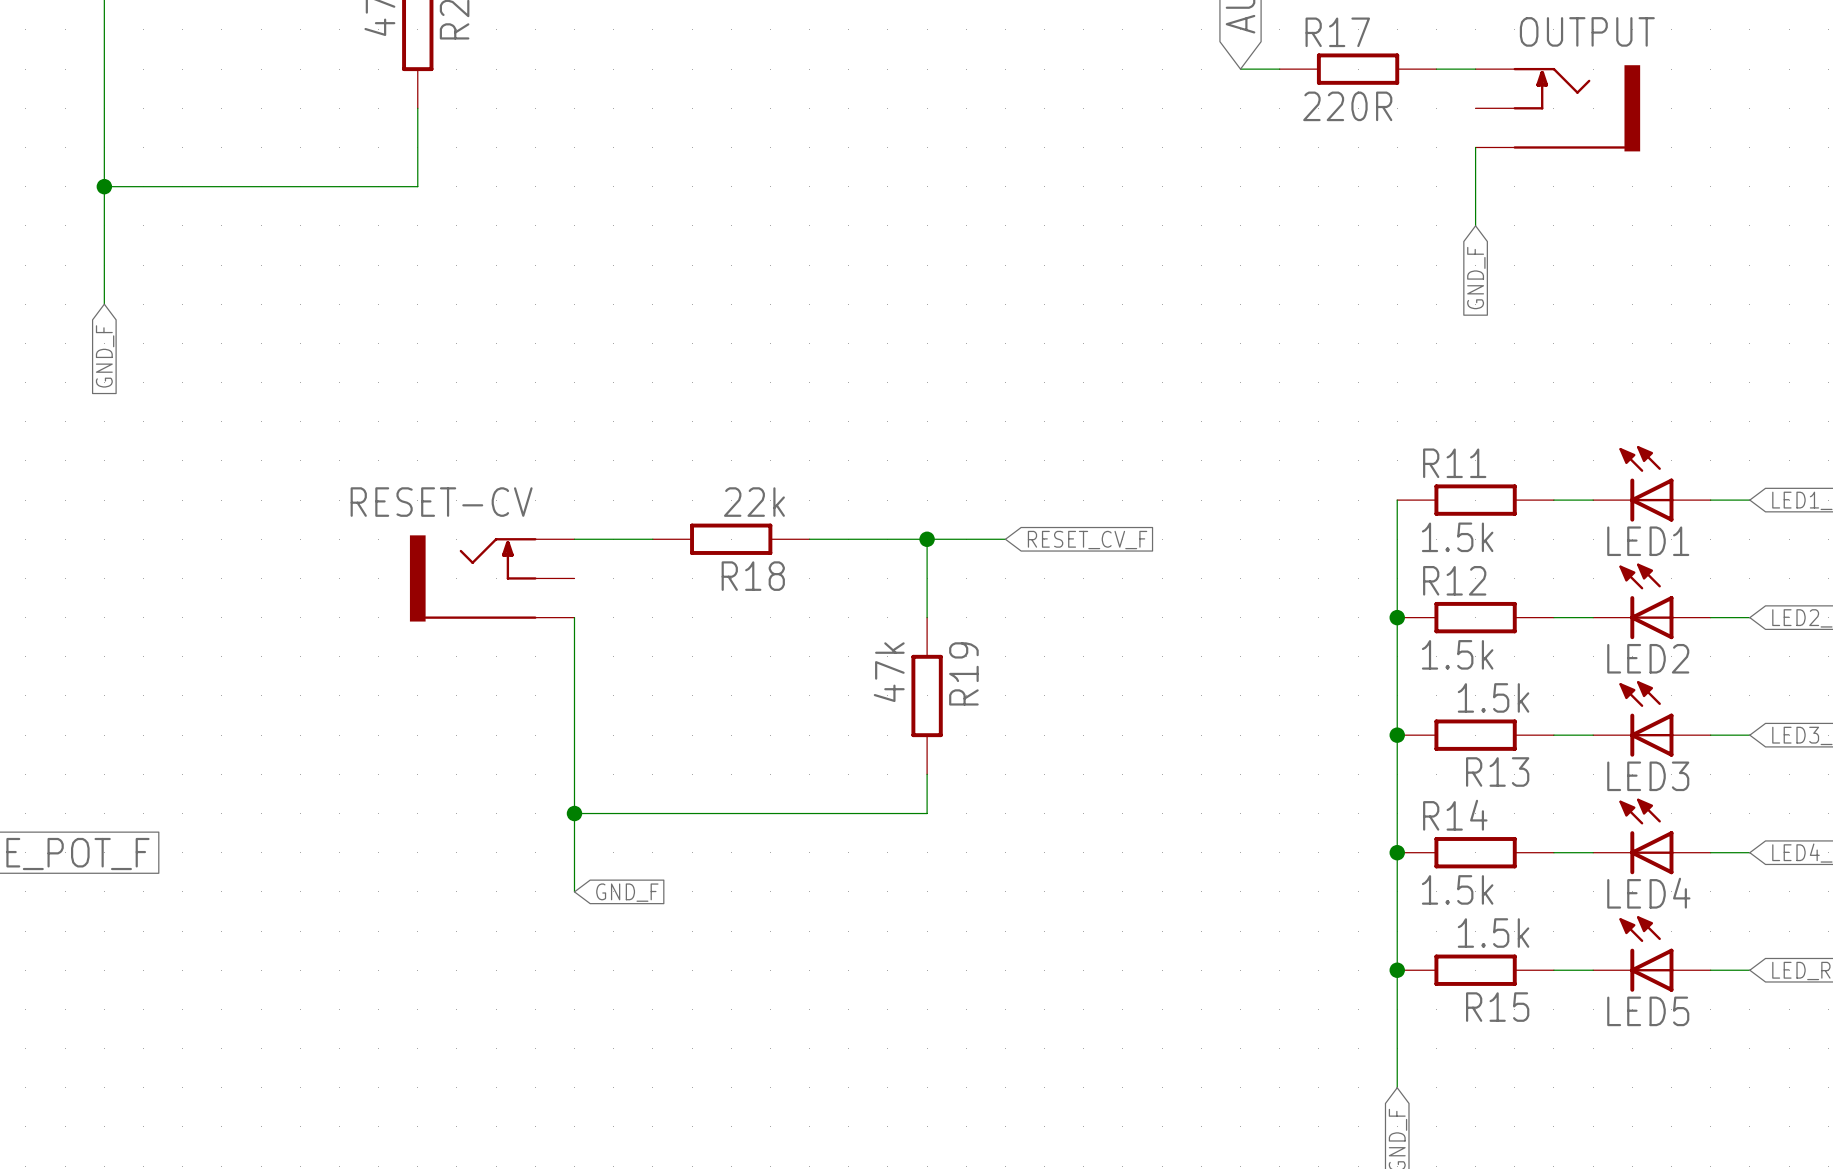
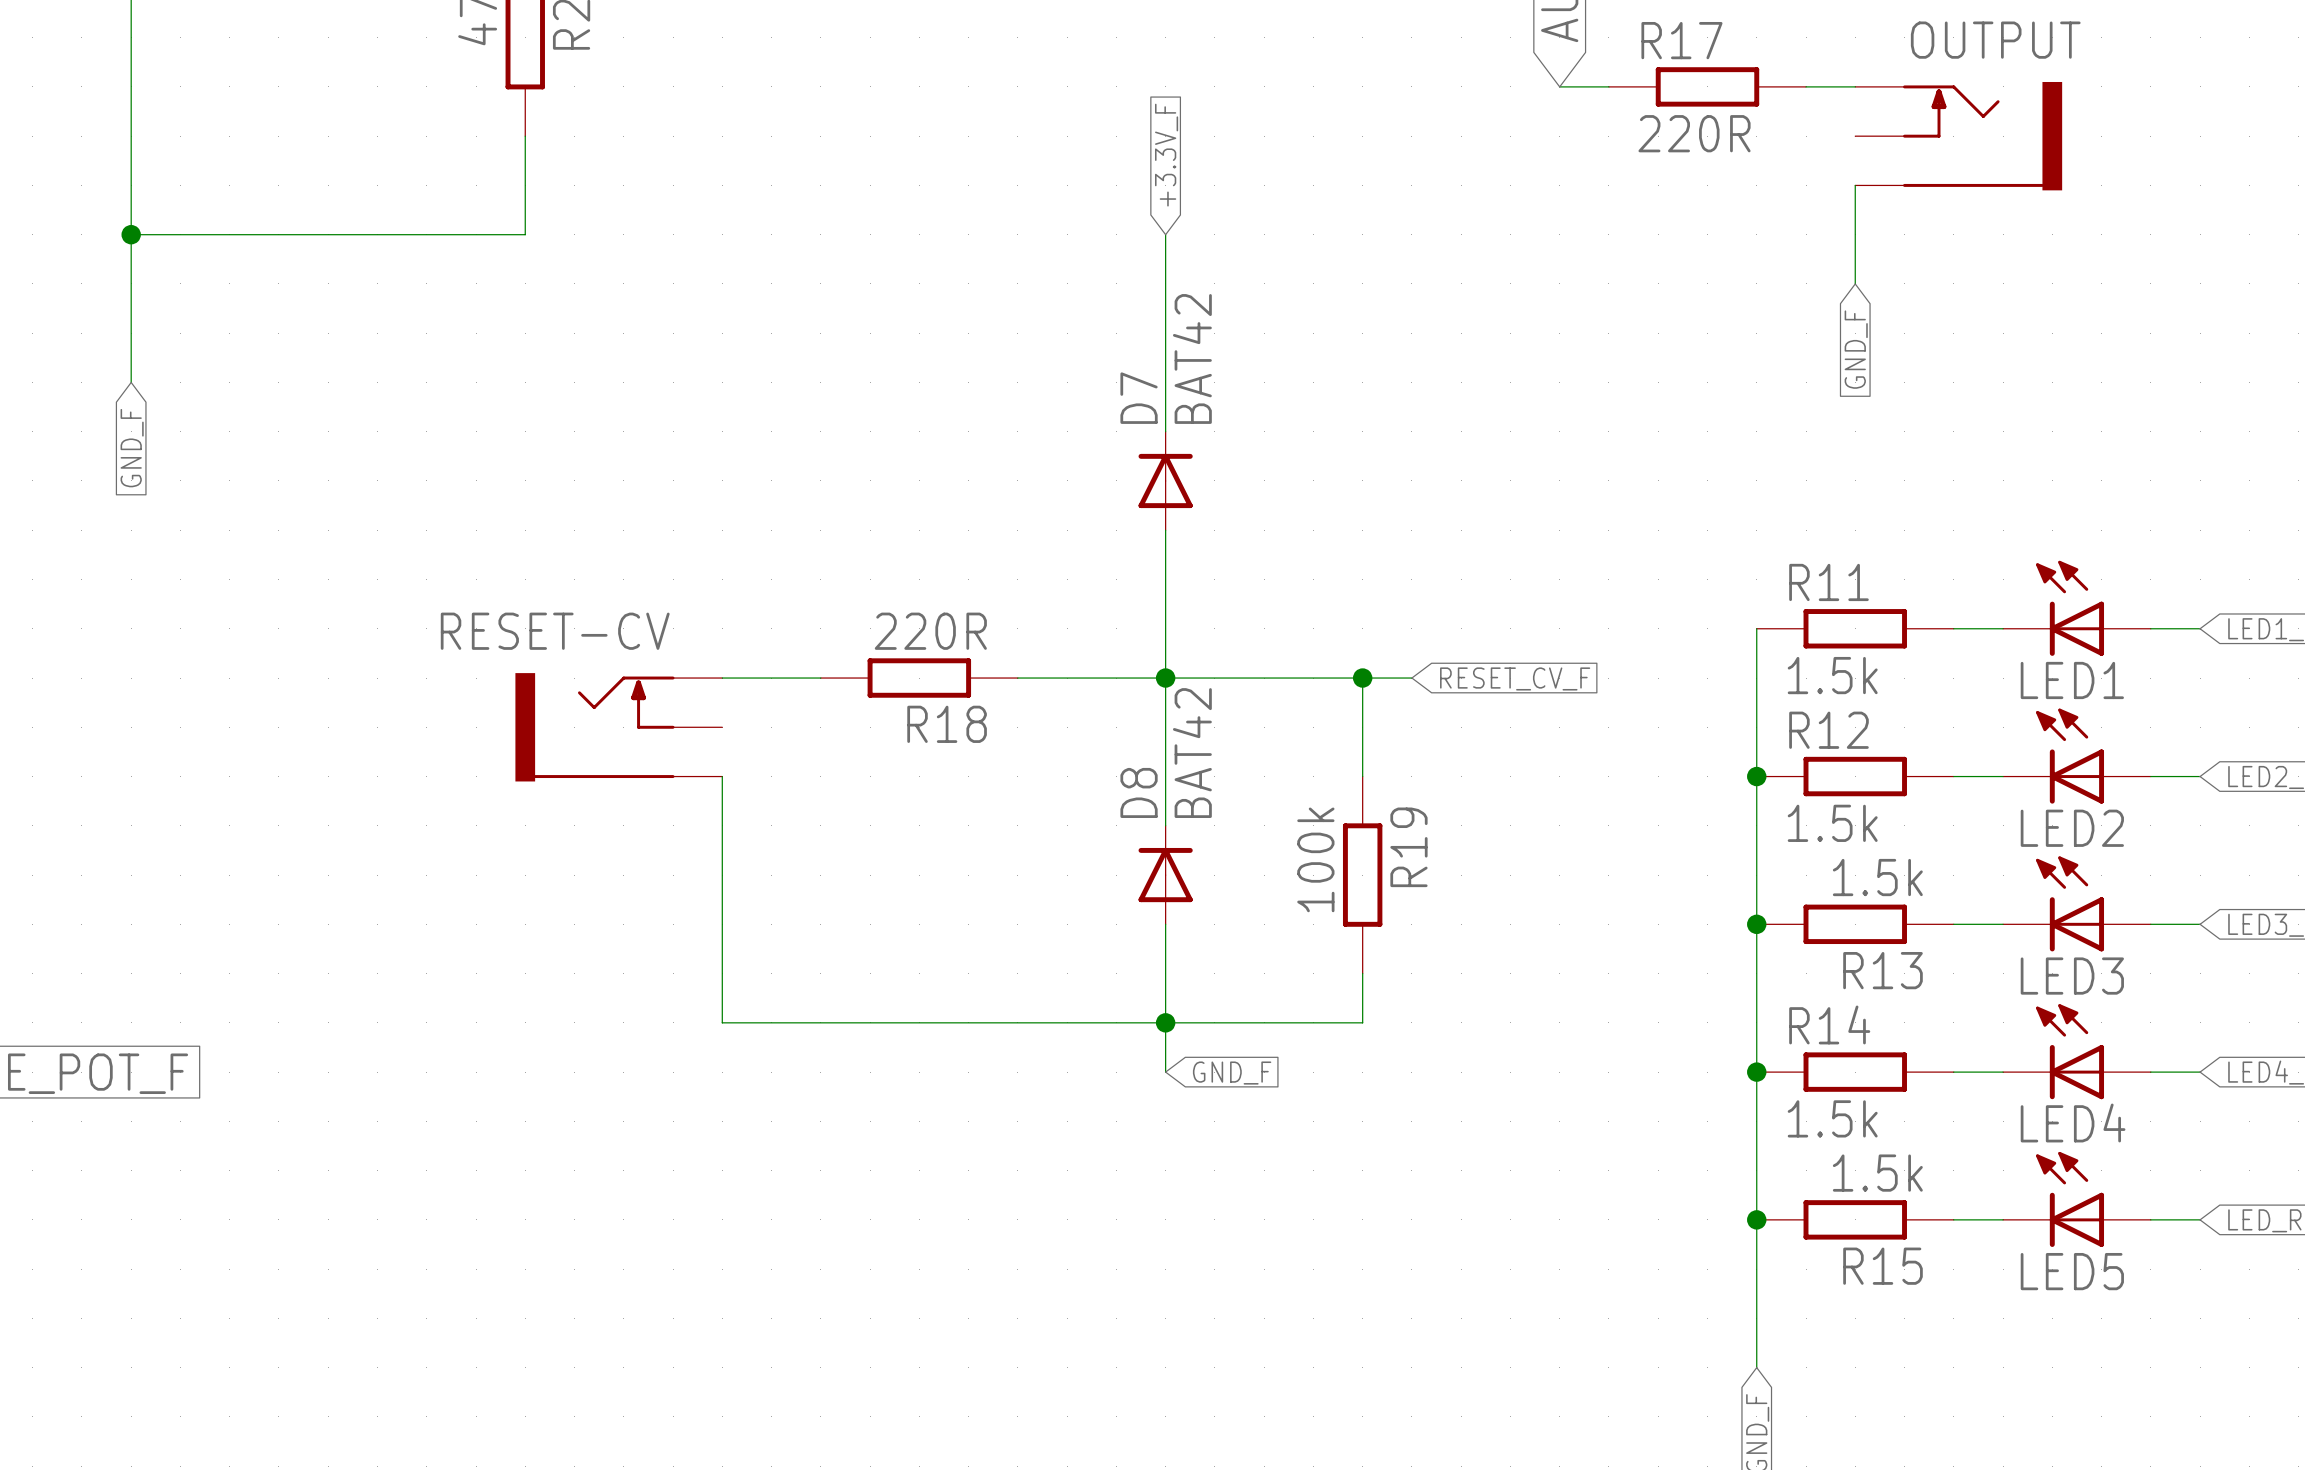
global label: none -> +3.3V_F (1166, 155)
wire: none -> (1165, 234) (1165, 431)
D7: none -> BAT42 (1165, 480)
wire: none -> (1165, 530) (1165, 678)
R18 value: 22k (754, 502) -> 220R (930, 631)
wire: none -> (1264, 678) (1411, 678)
wire: none -> (1362, 678) (1362, 776)
junction: none -> (1362, 678)
global label position: RESET_CV_F (1087, 540) -> RESET_CV_F (1515, 678)
R19 value: 47k (889, 672) -> 100k (1315, 859)
R19 position: (927, 695) -> (1362, 875)
D8: none -> BAT42 (1165, 875)
wire: none -> (1362, 973) (1362, 1022) (1165, 1022) (1165, 1072)
wire: (574, 813) (574, 891) -> none
junction: (574, 813) -> none
junction: none -> (1165, 1022)
global label position: GND_F (627, 892) -> GND_F (1232, 1073)

